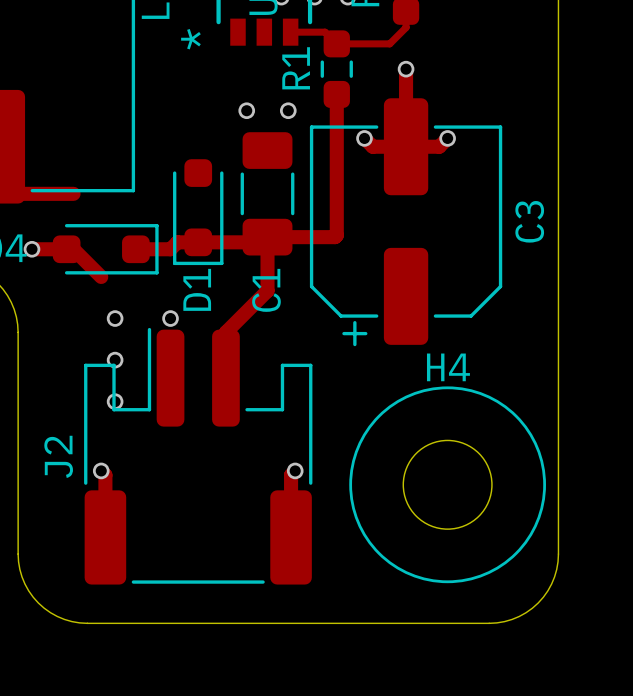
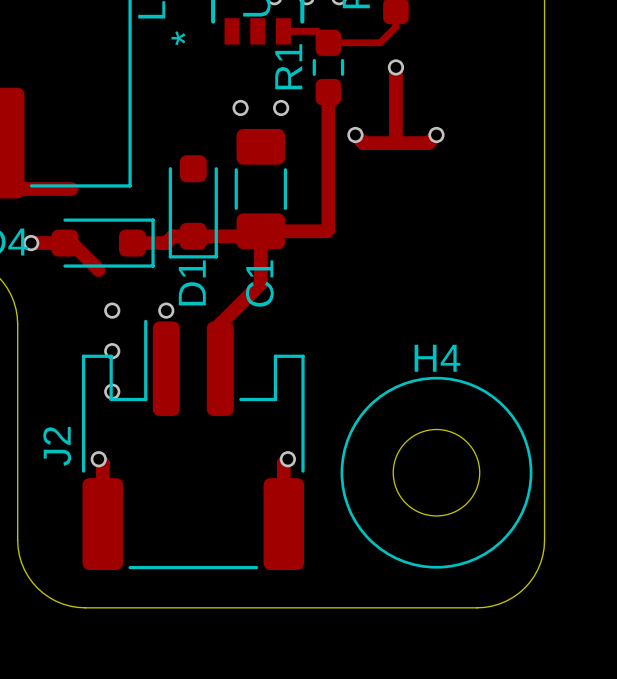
C3: (406, 222) -> none

